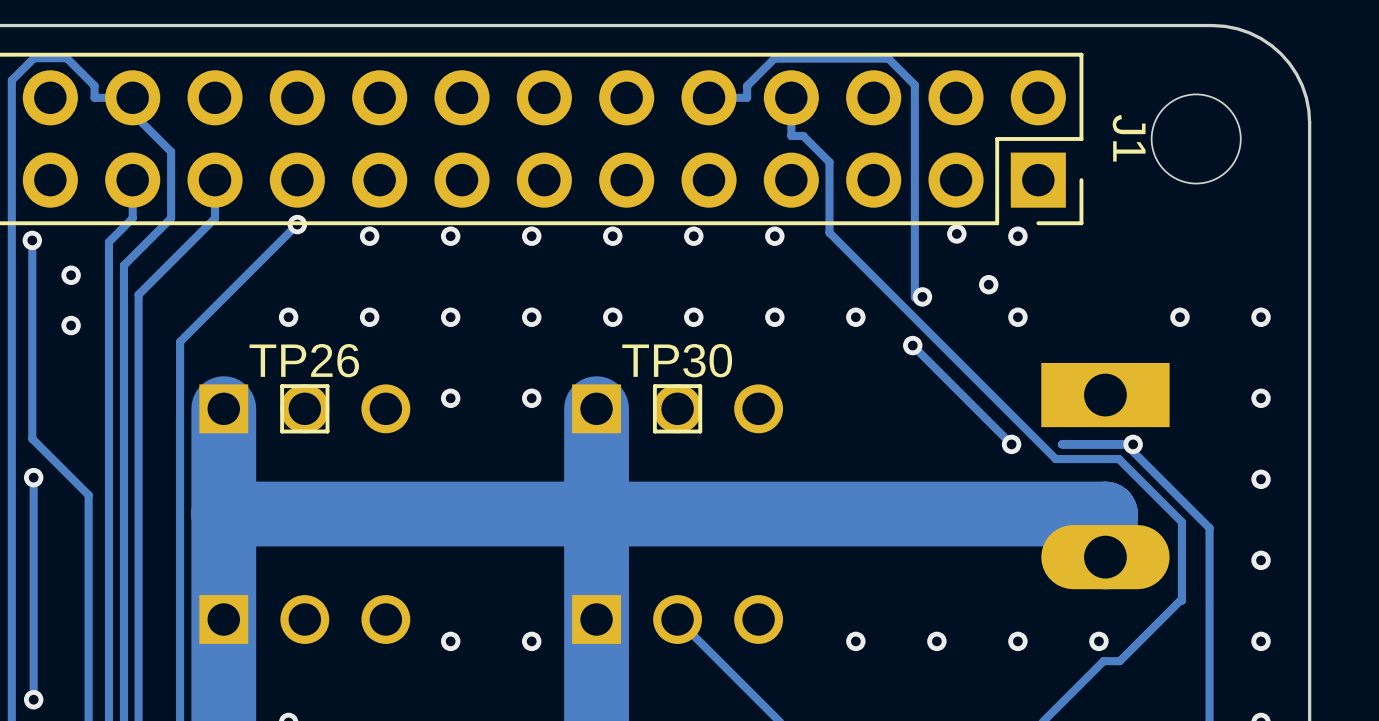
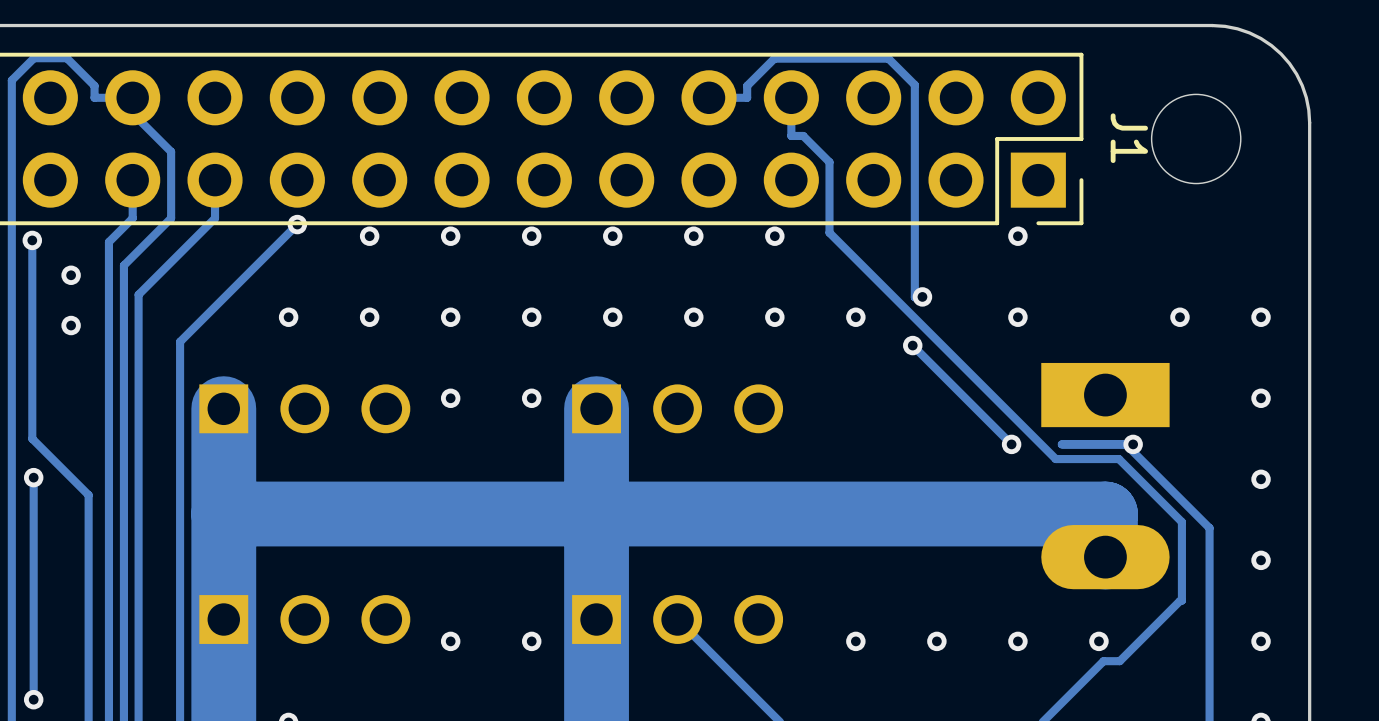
via: (956, 233) -> none
via: (988, 284) -> none
TP26: (304, 408) -> none
TP30: (677, 408) -> none

